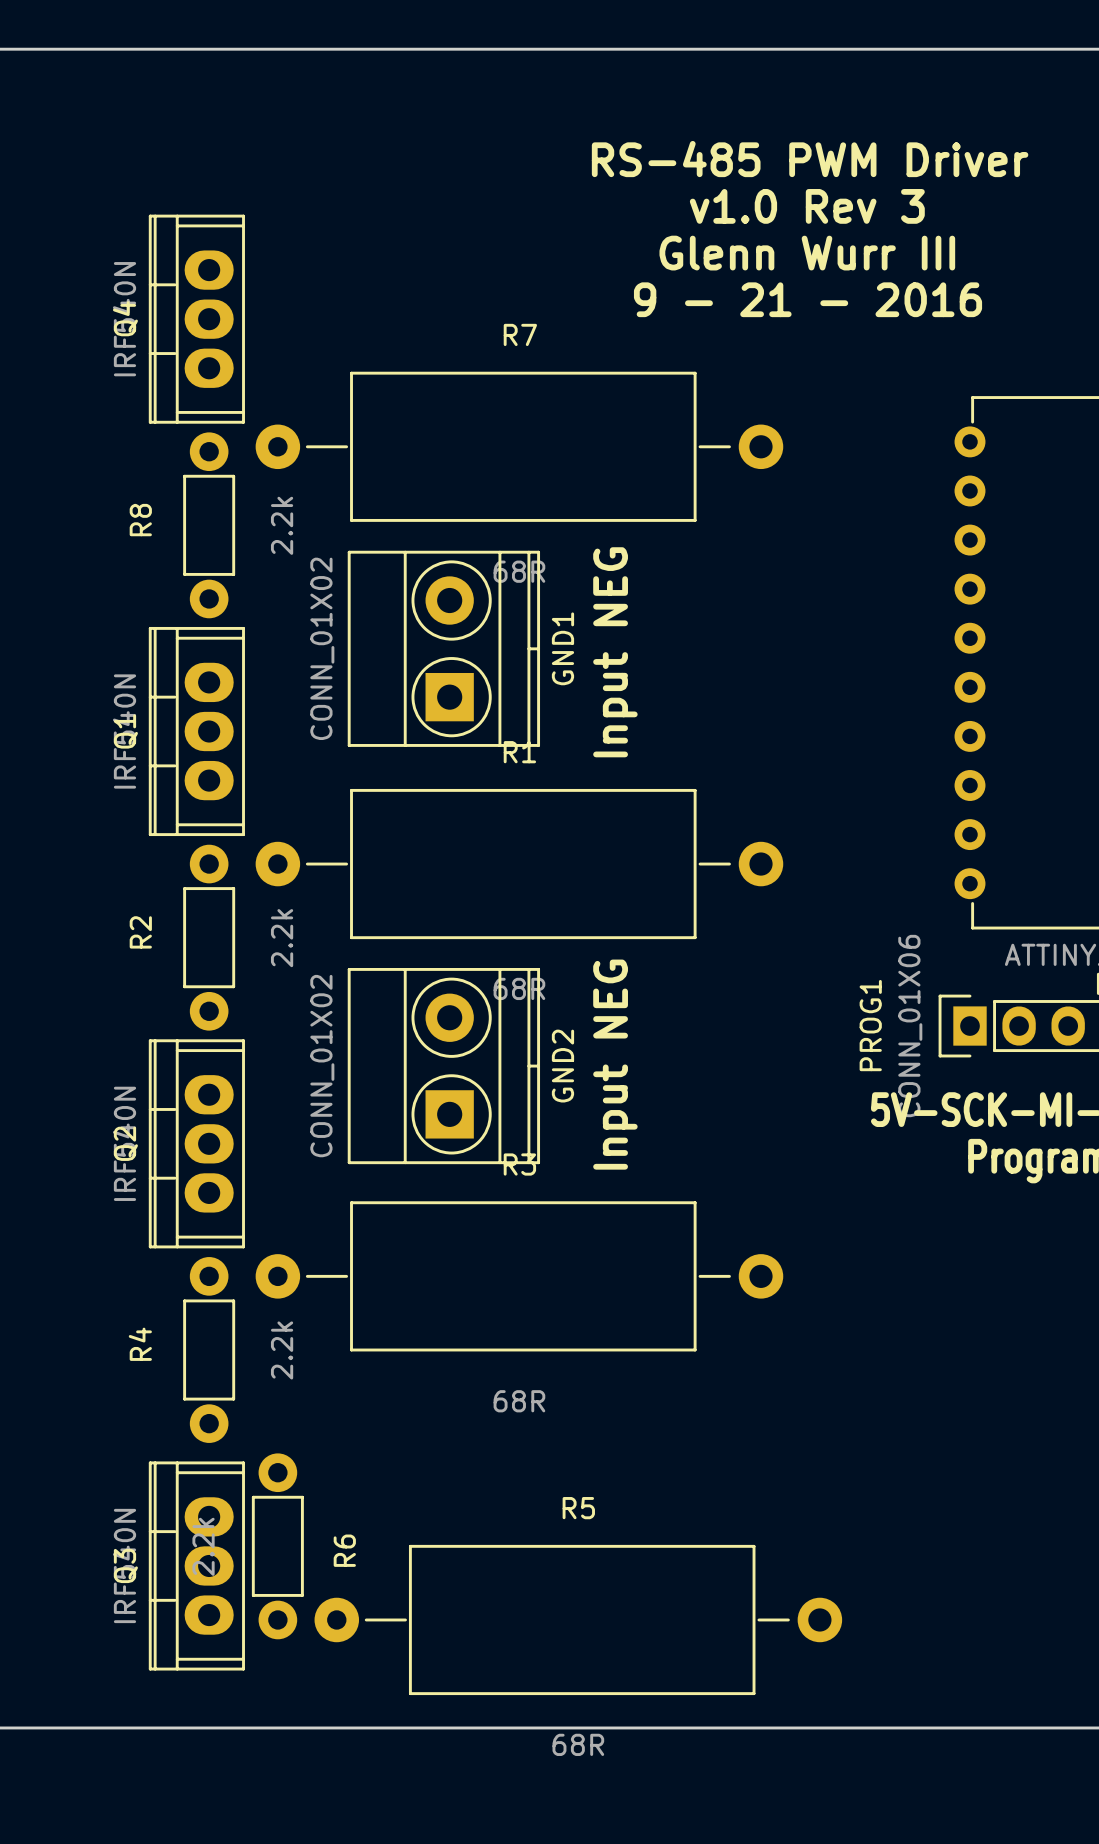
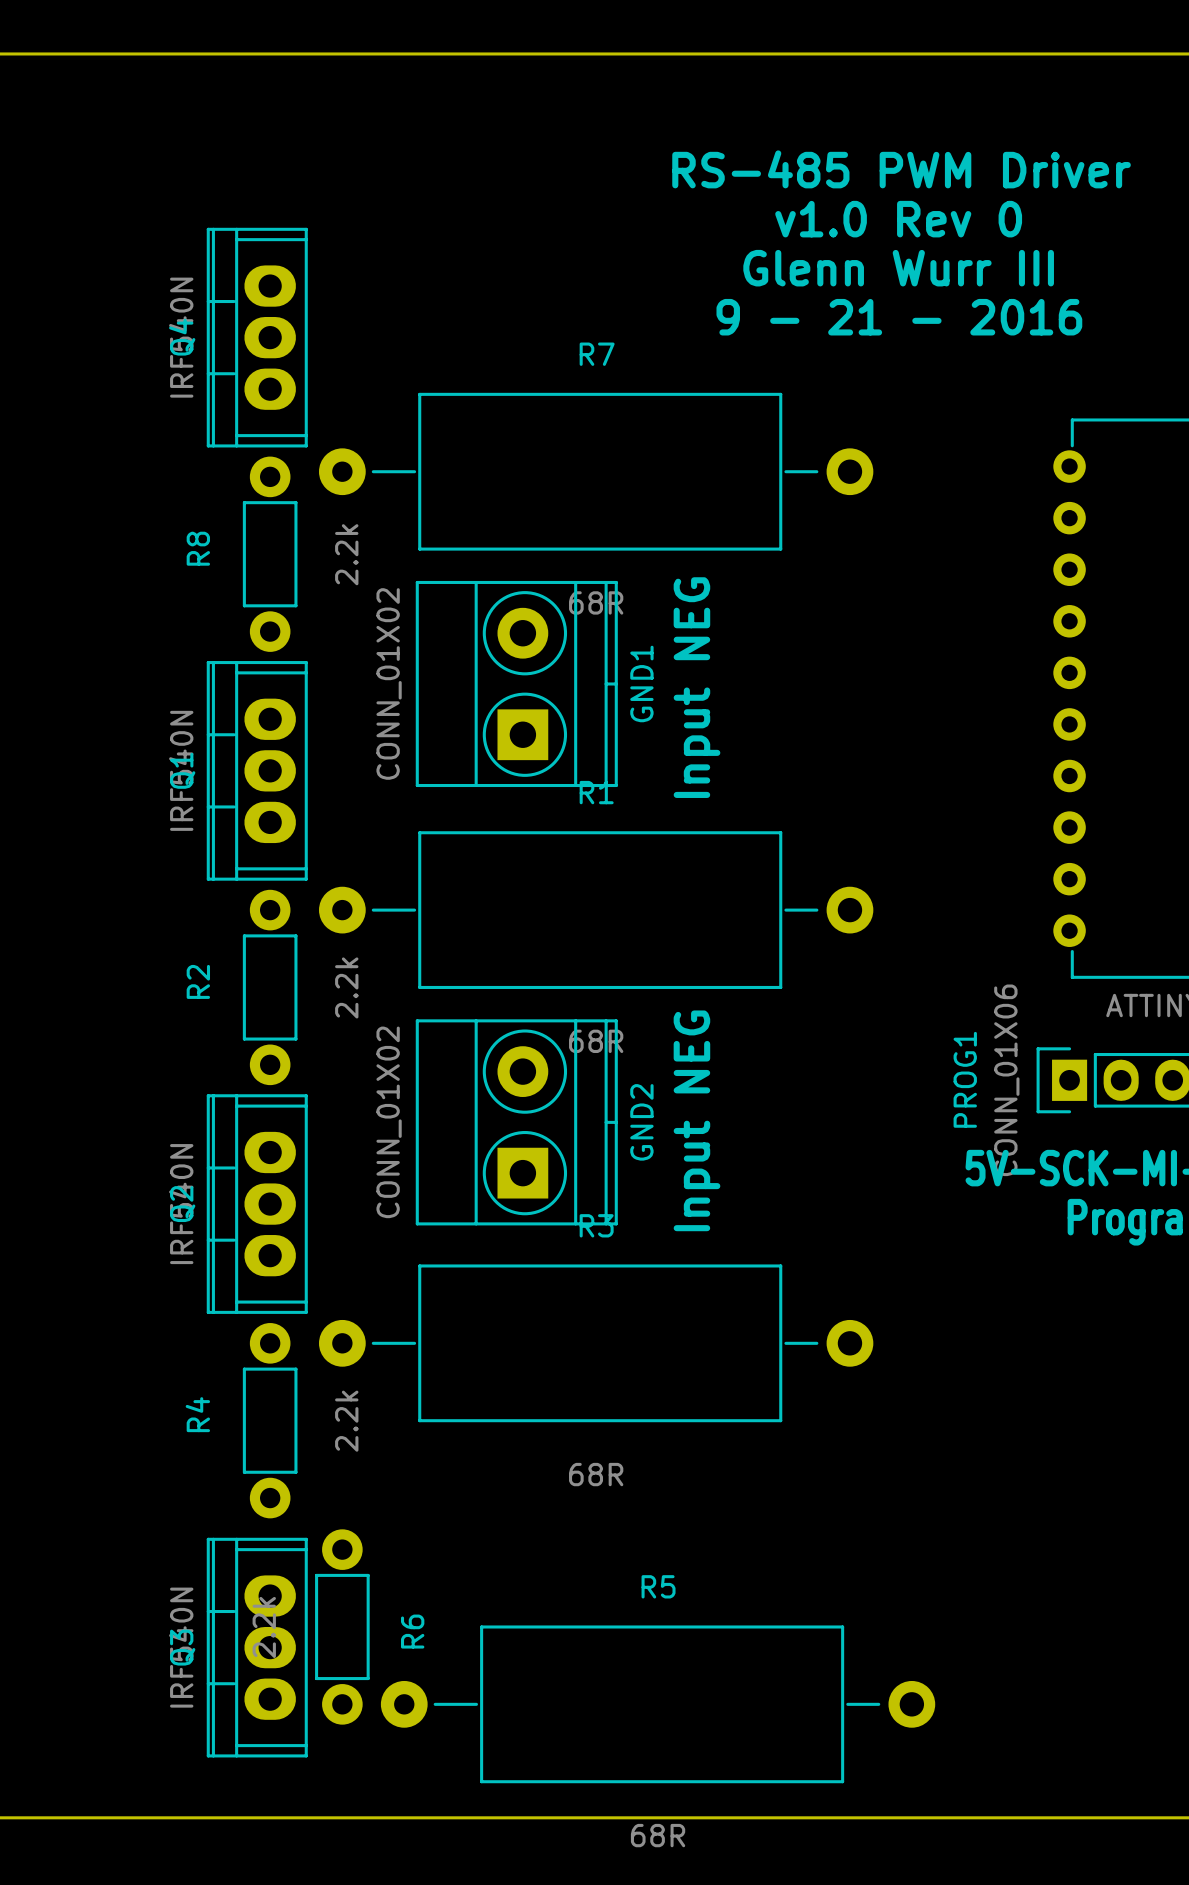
text: v1.0 Rev 3 (807, 206) -> v1.0 Rev 0 (898, 219)

